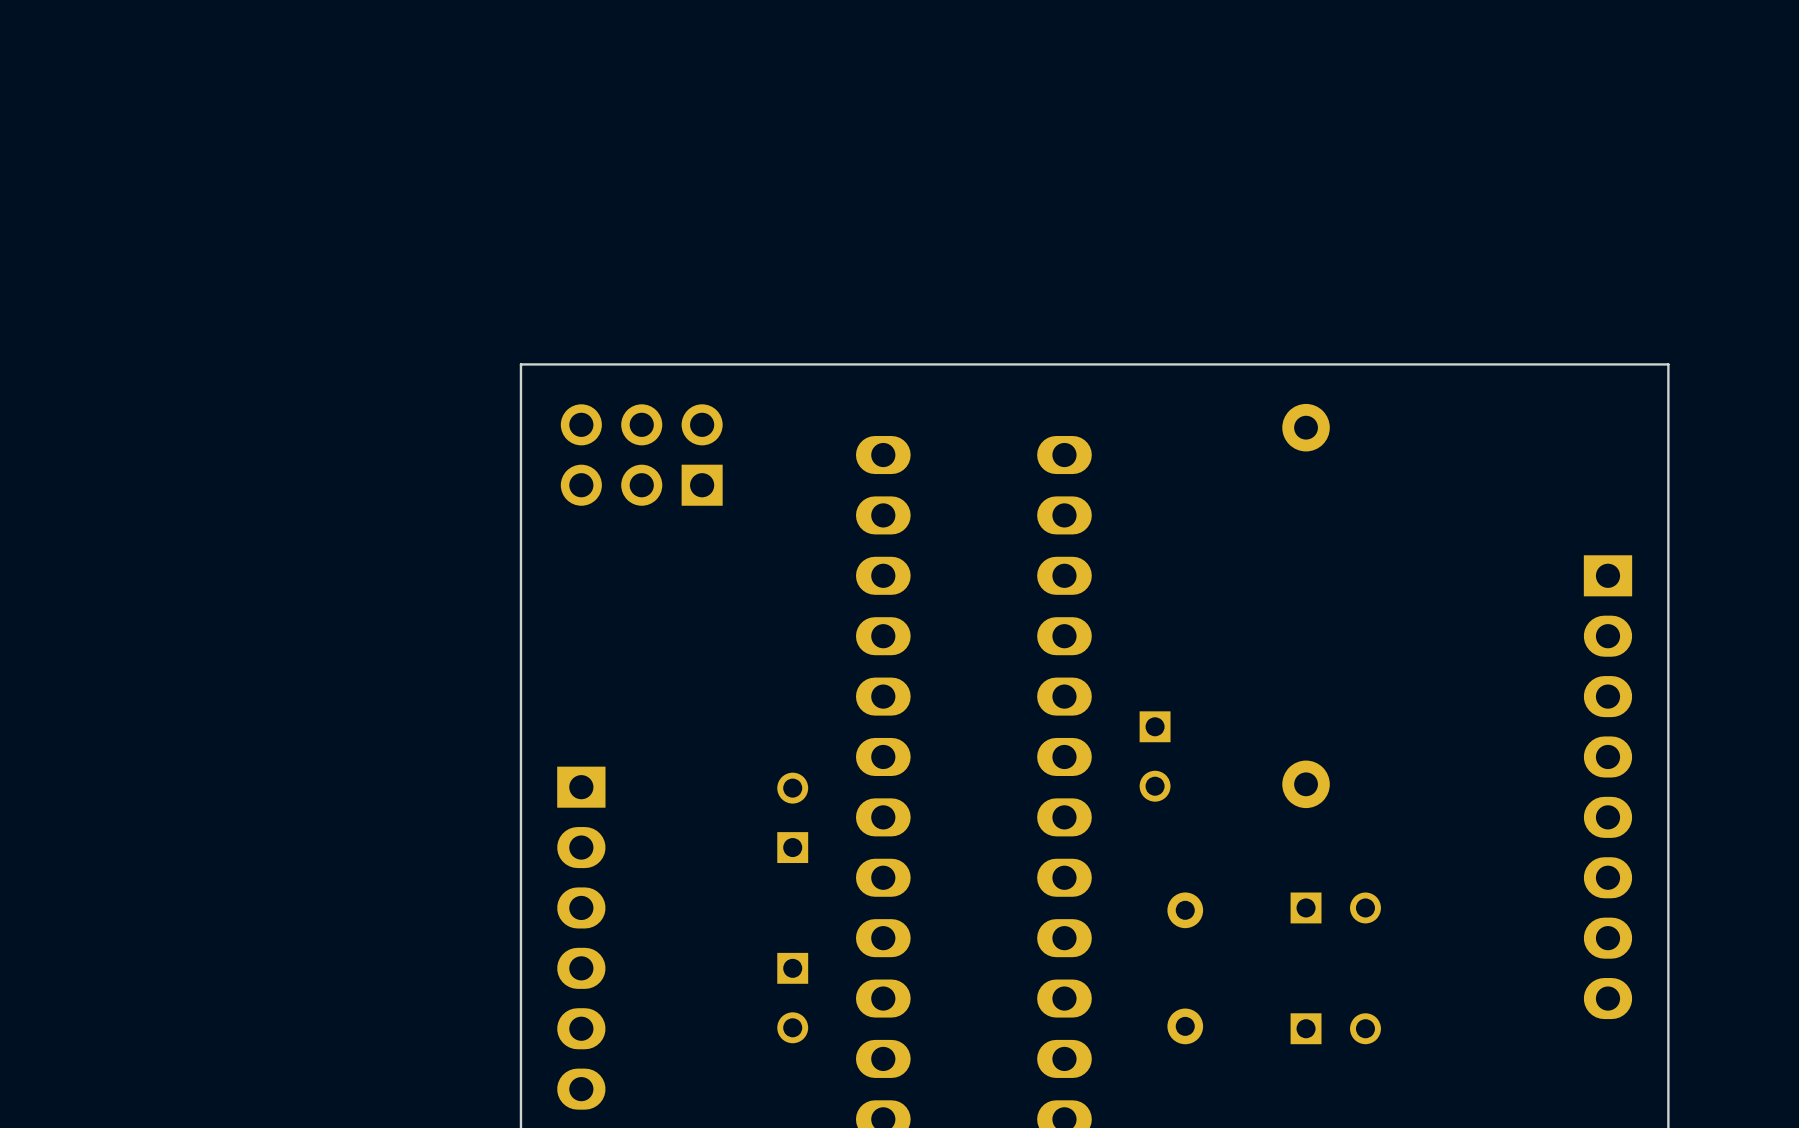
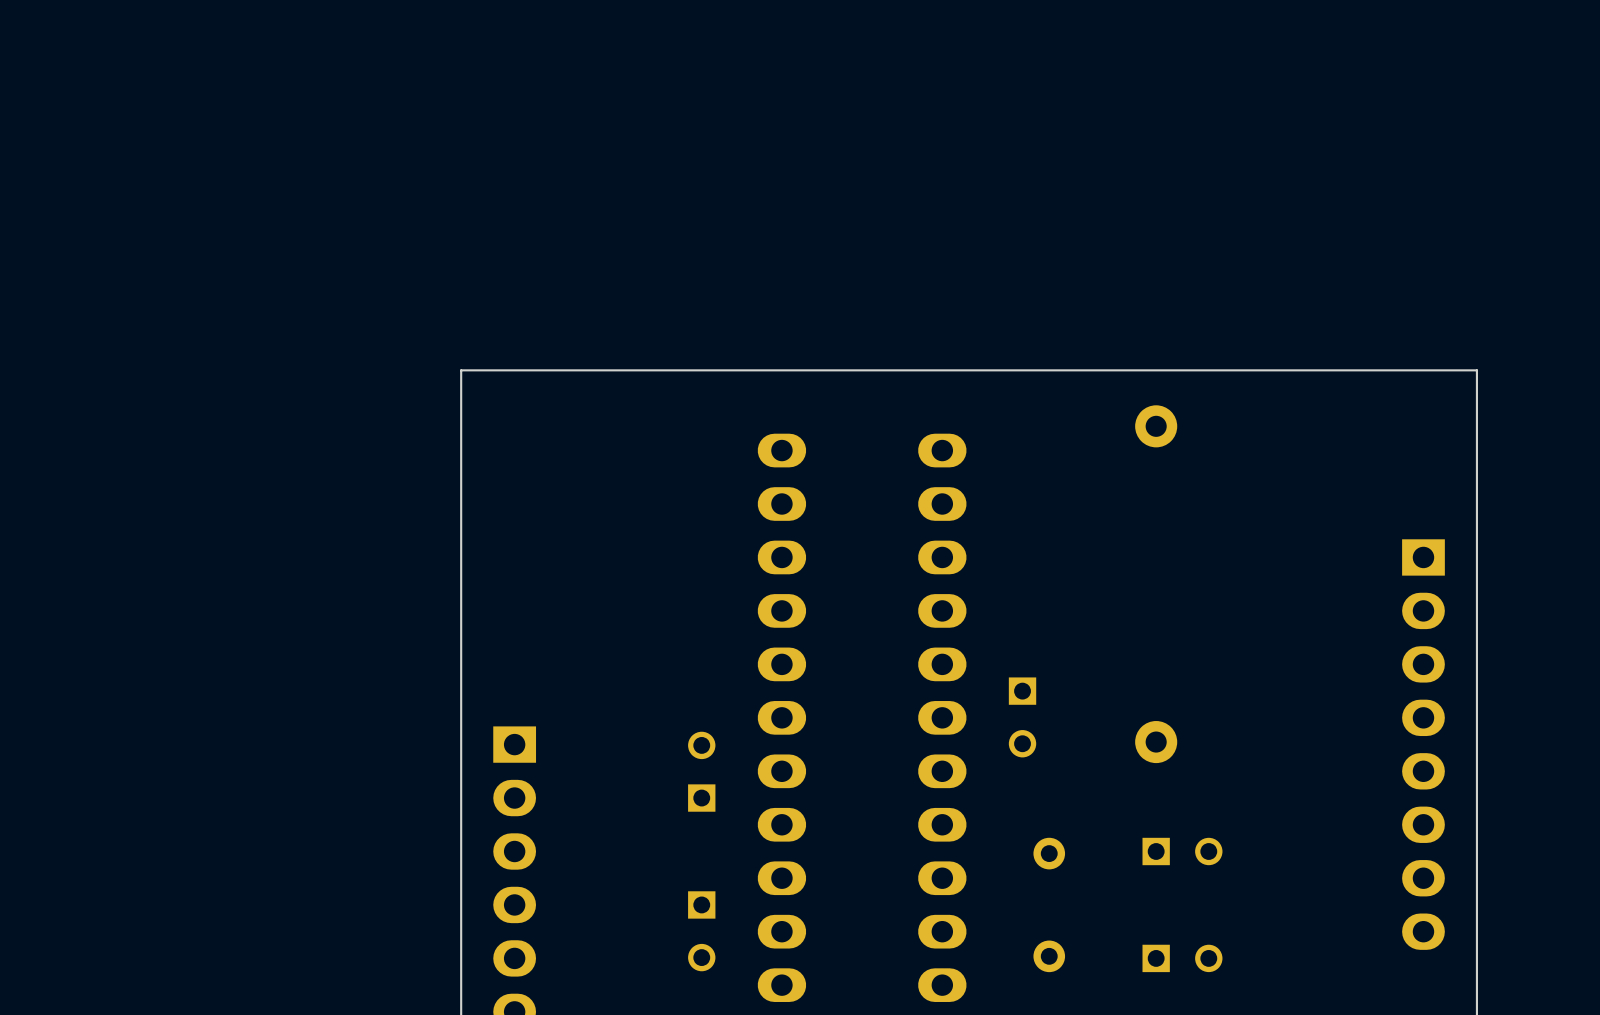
part: (641, 455) -> none

